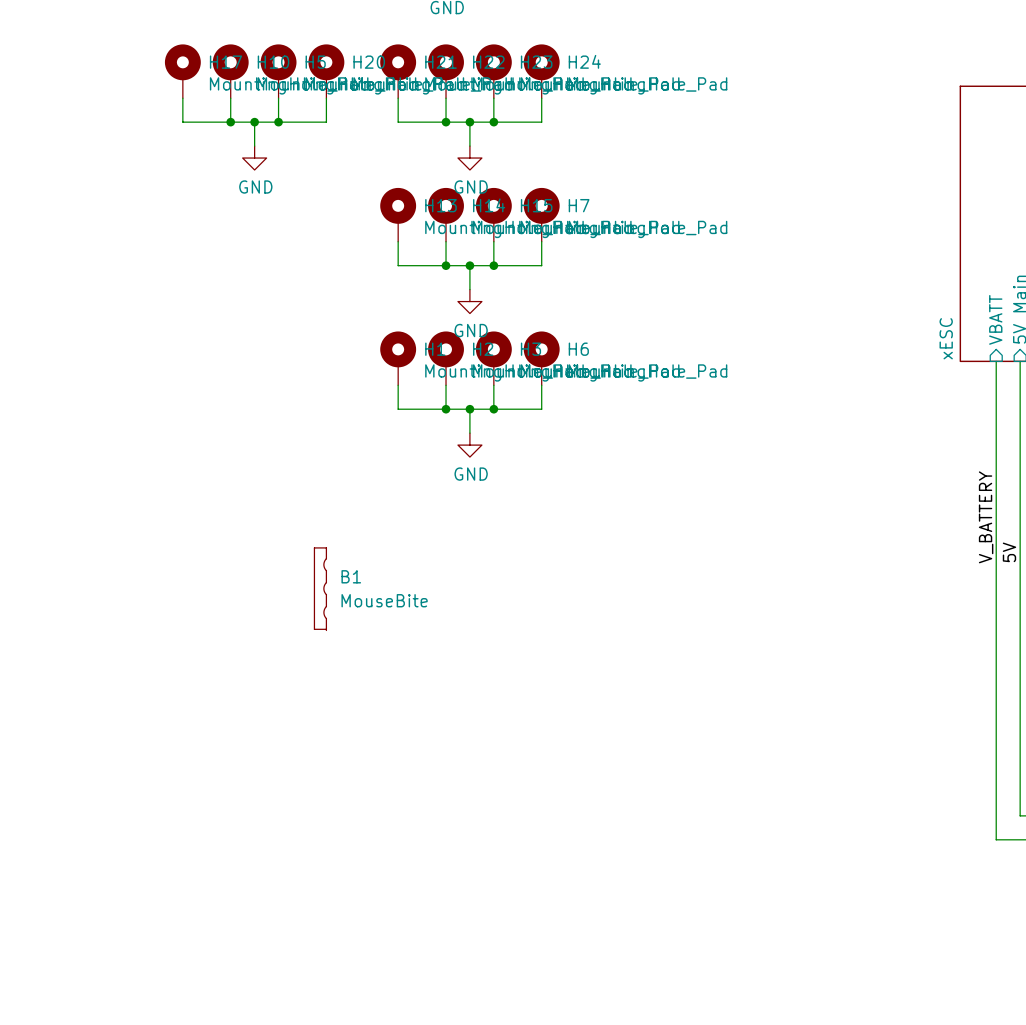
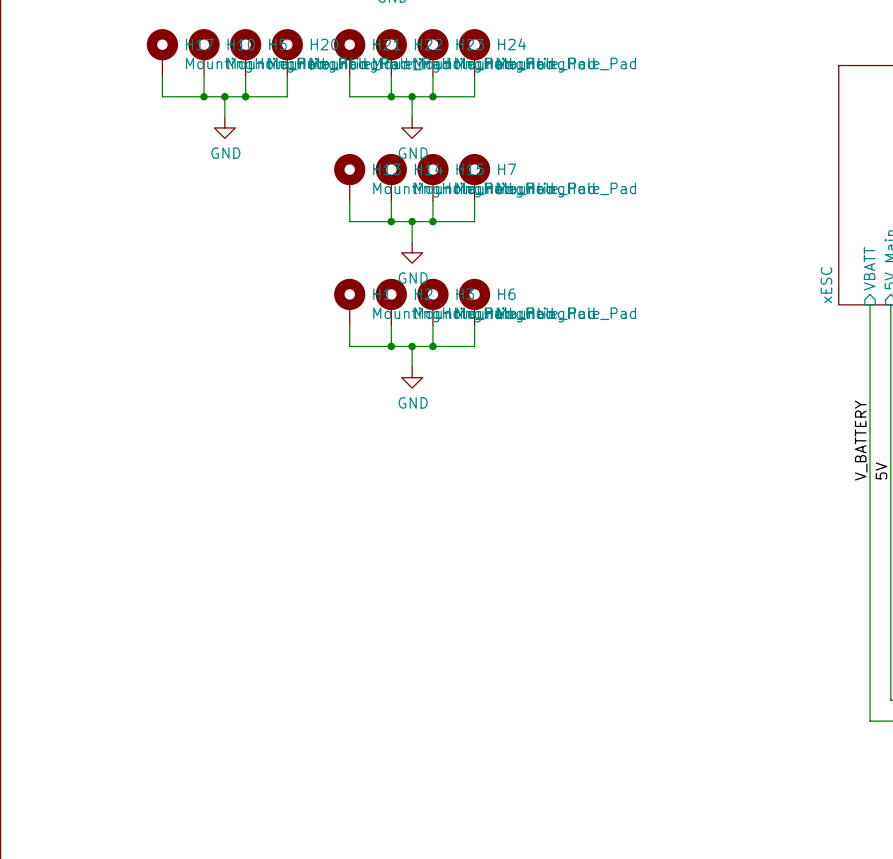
B1: MouseBite (320, 589) -> none

